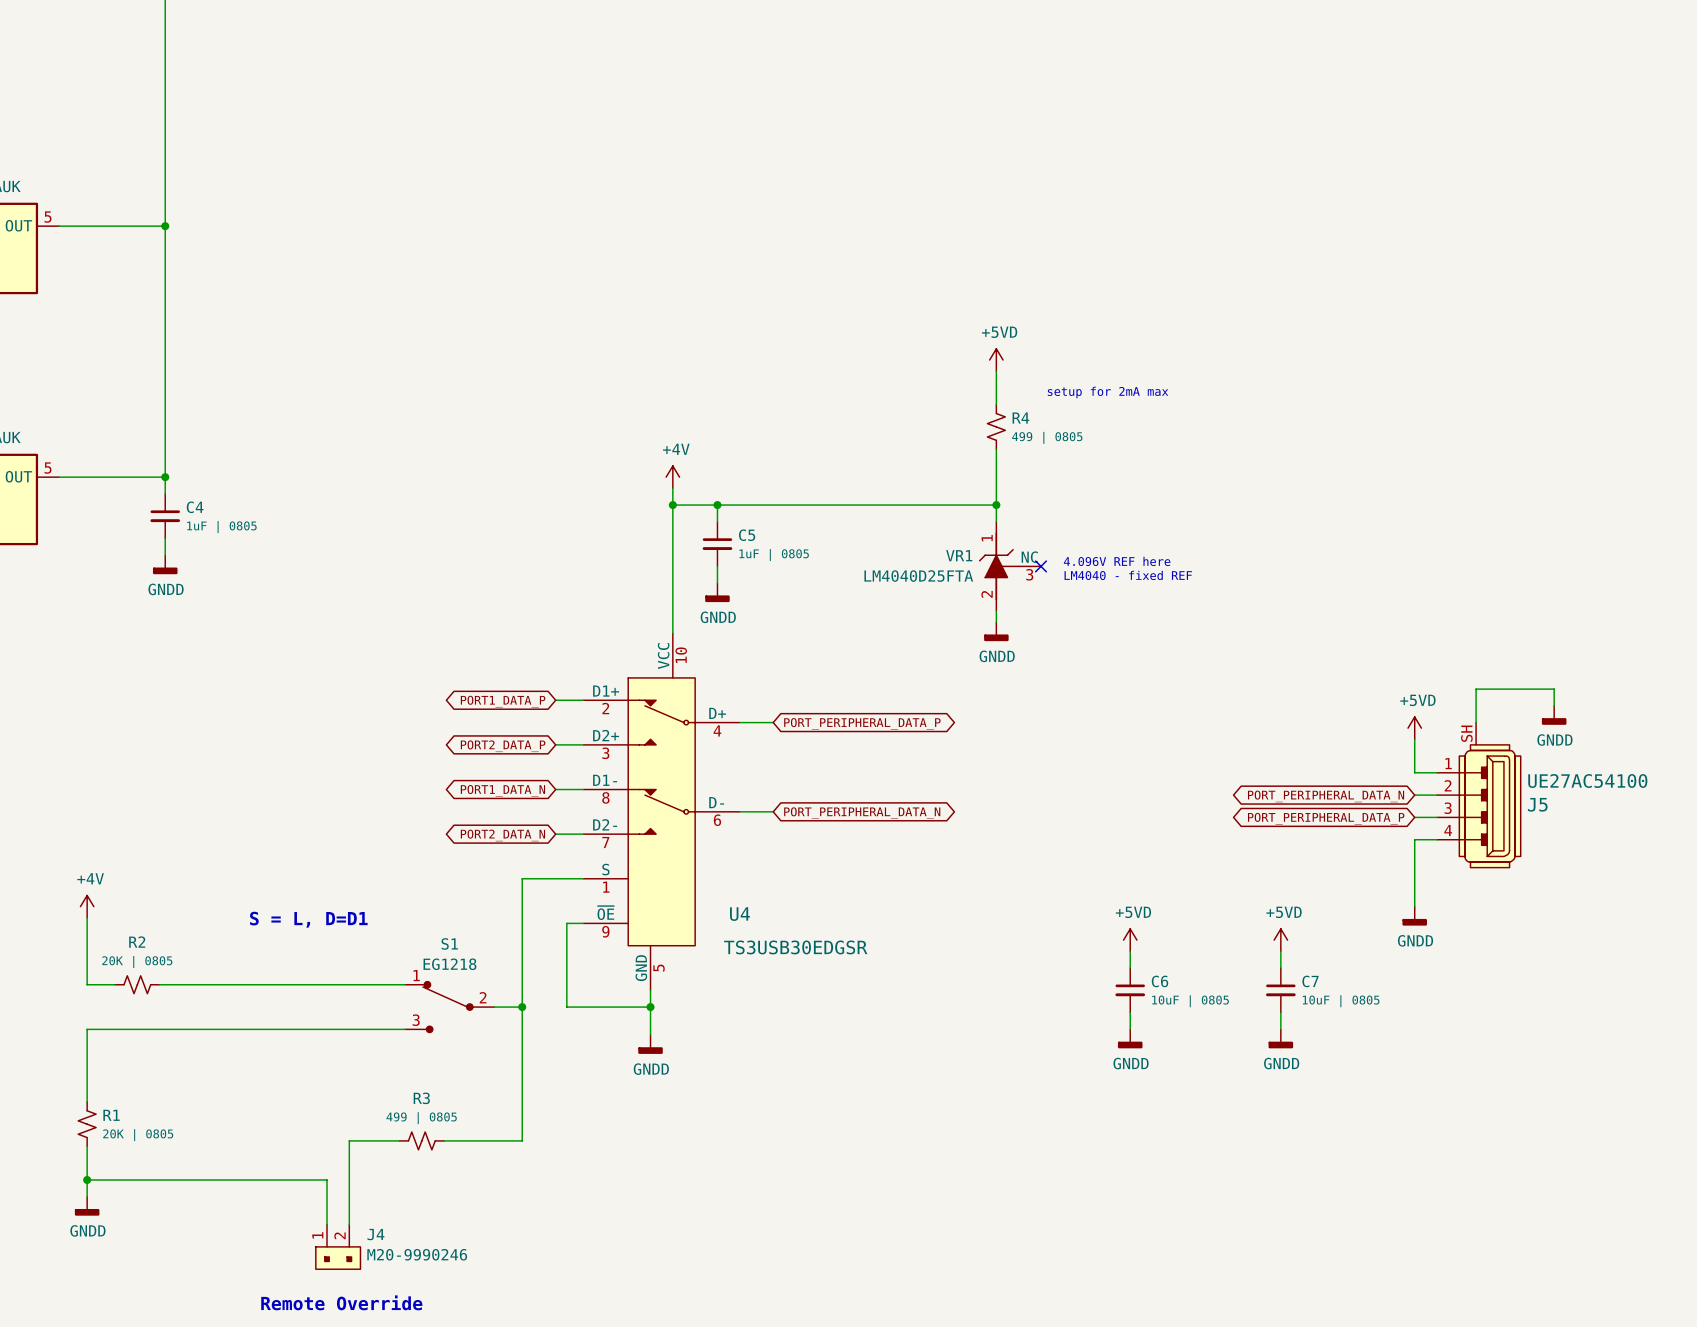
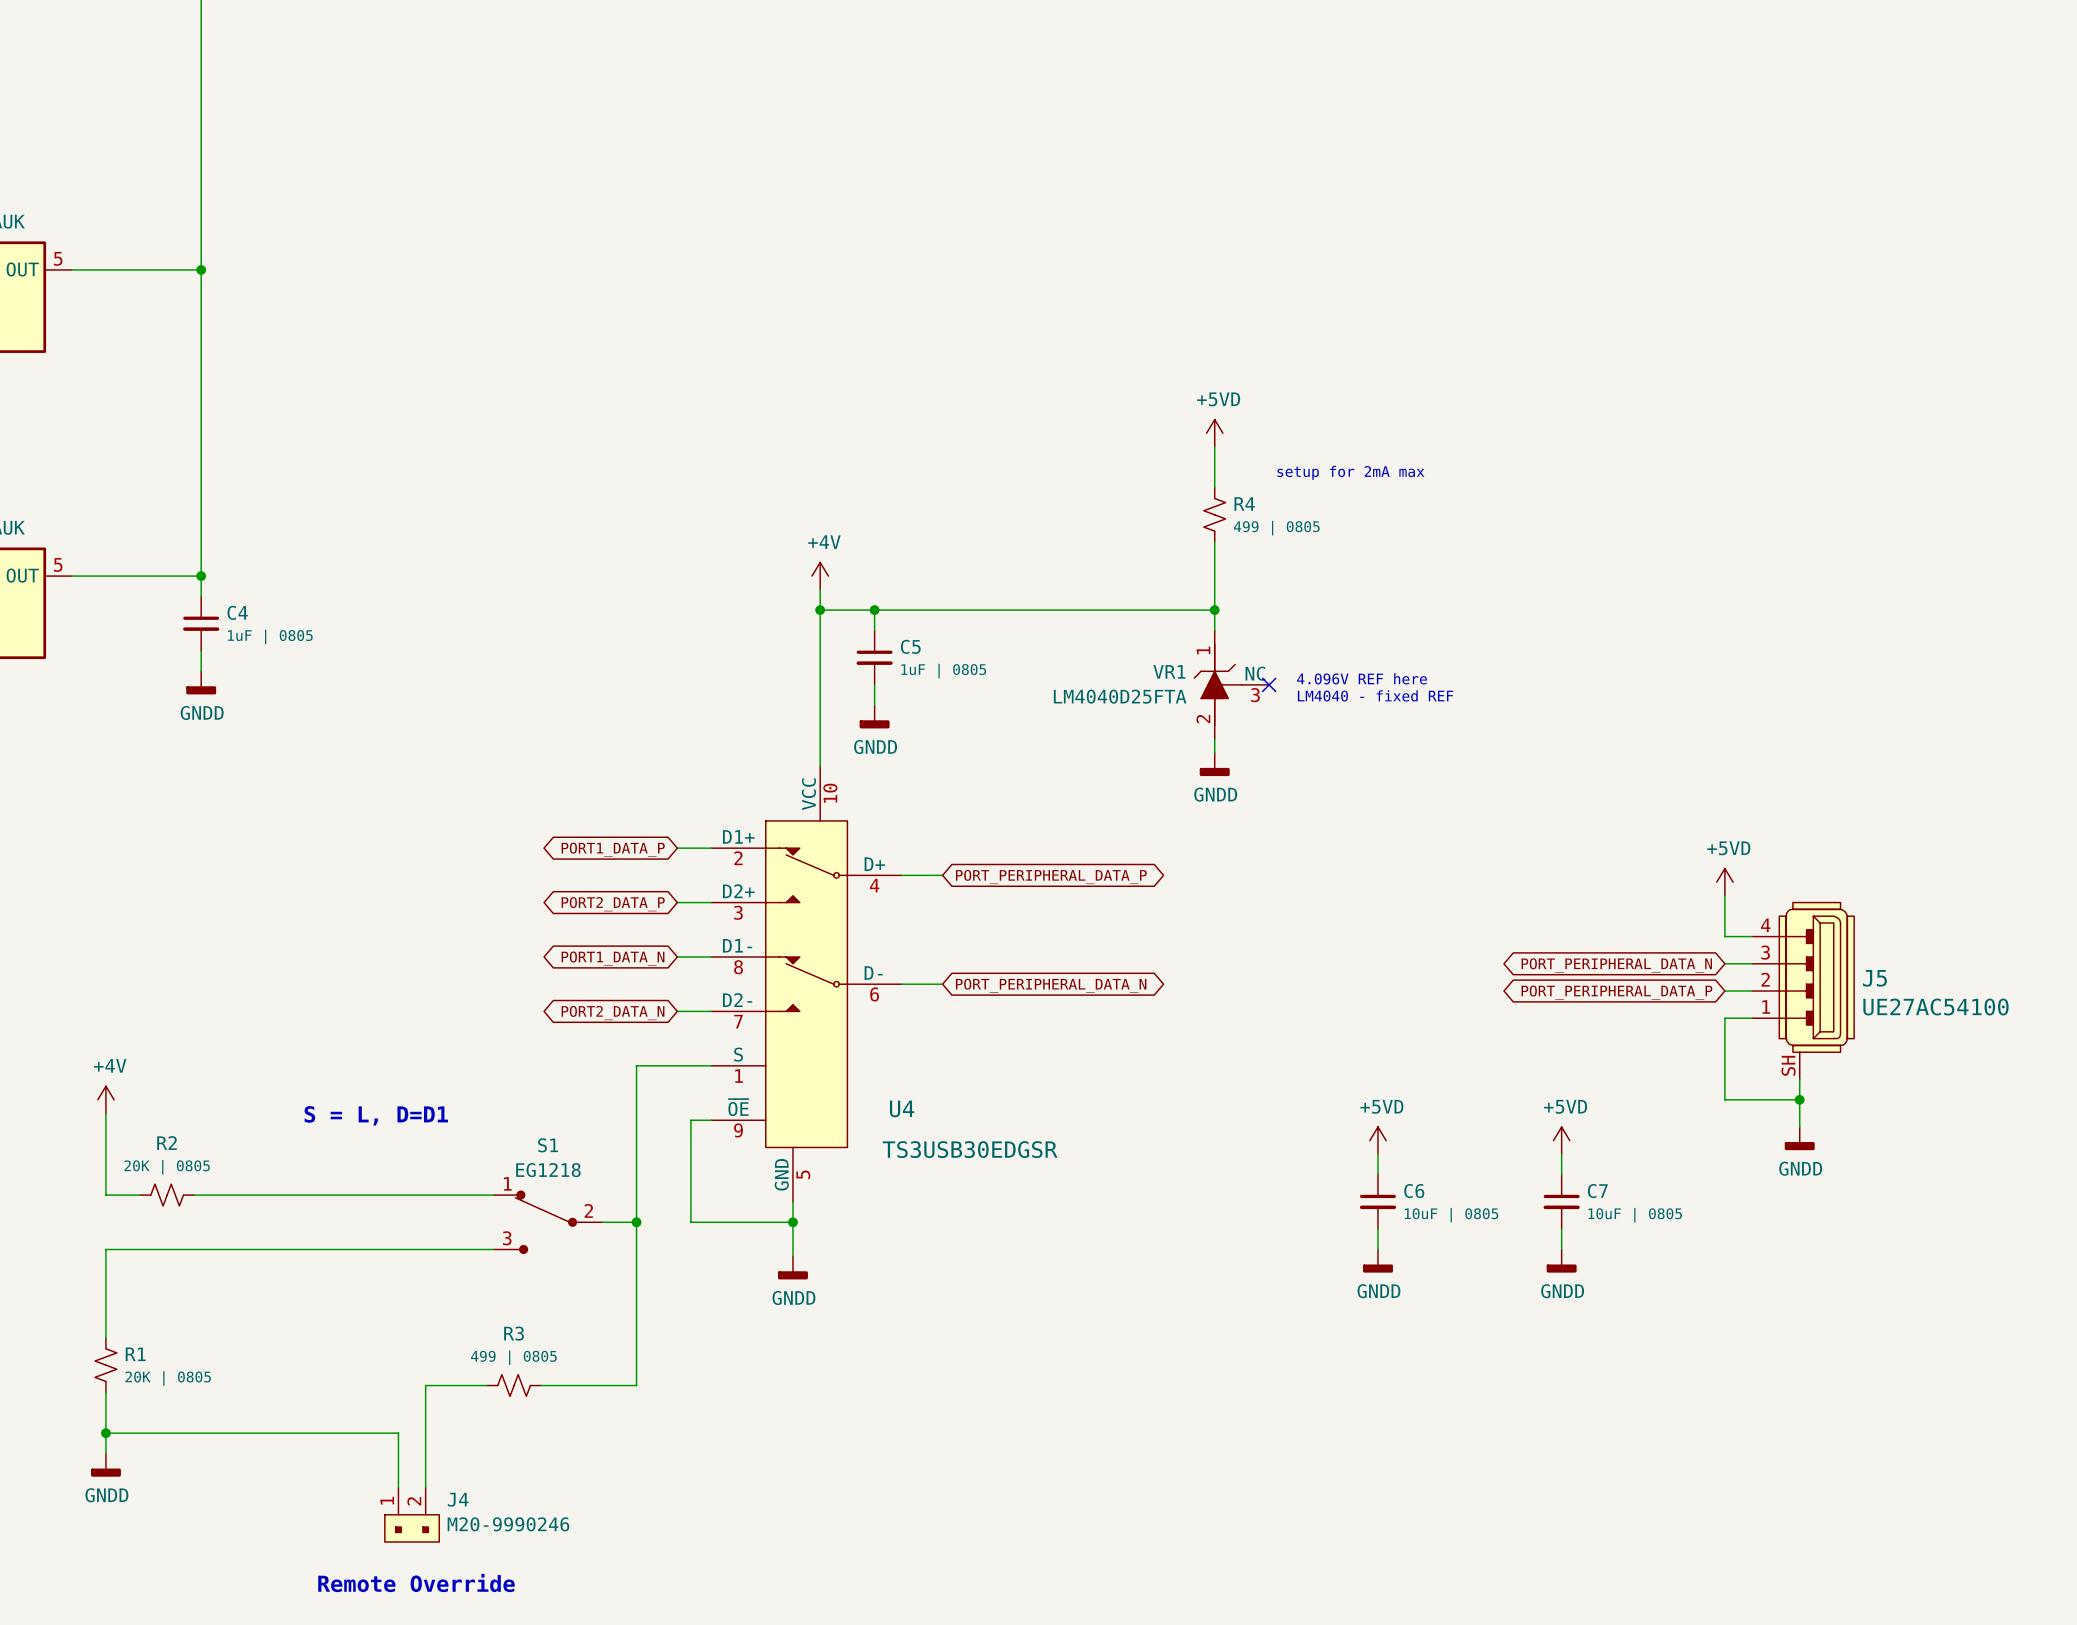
wire: (1554, 705) (1554, 689) (1476, 689) (1476, 722) -> none
power symbol: GNDD (1554, 715) -> none
J5 flip: as is (1490, 806) -> up-down (1816, 977)
wire: none -> (1799, 1079) (1799, 1127)
wire: none -> (1724, 1099) (1799, 1099)
junction: none -> (1799, 1099)
power symbol position: GNDD (1414, 916) -> GNDD (1799, 1138)

